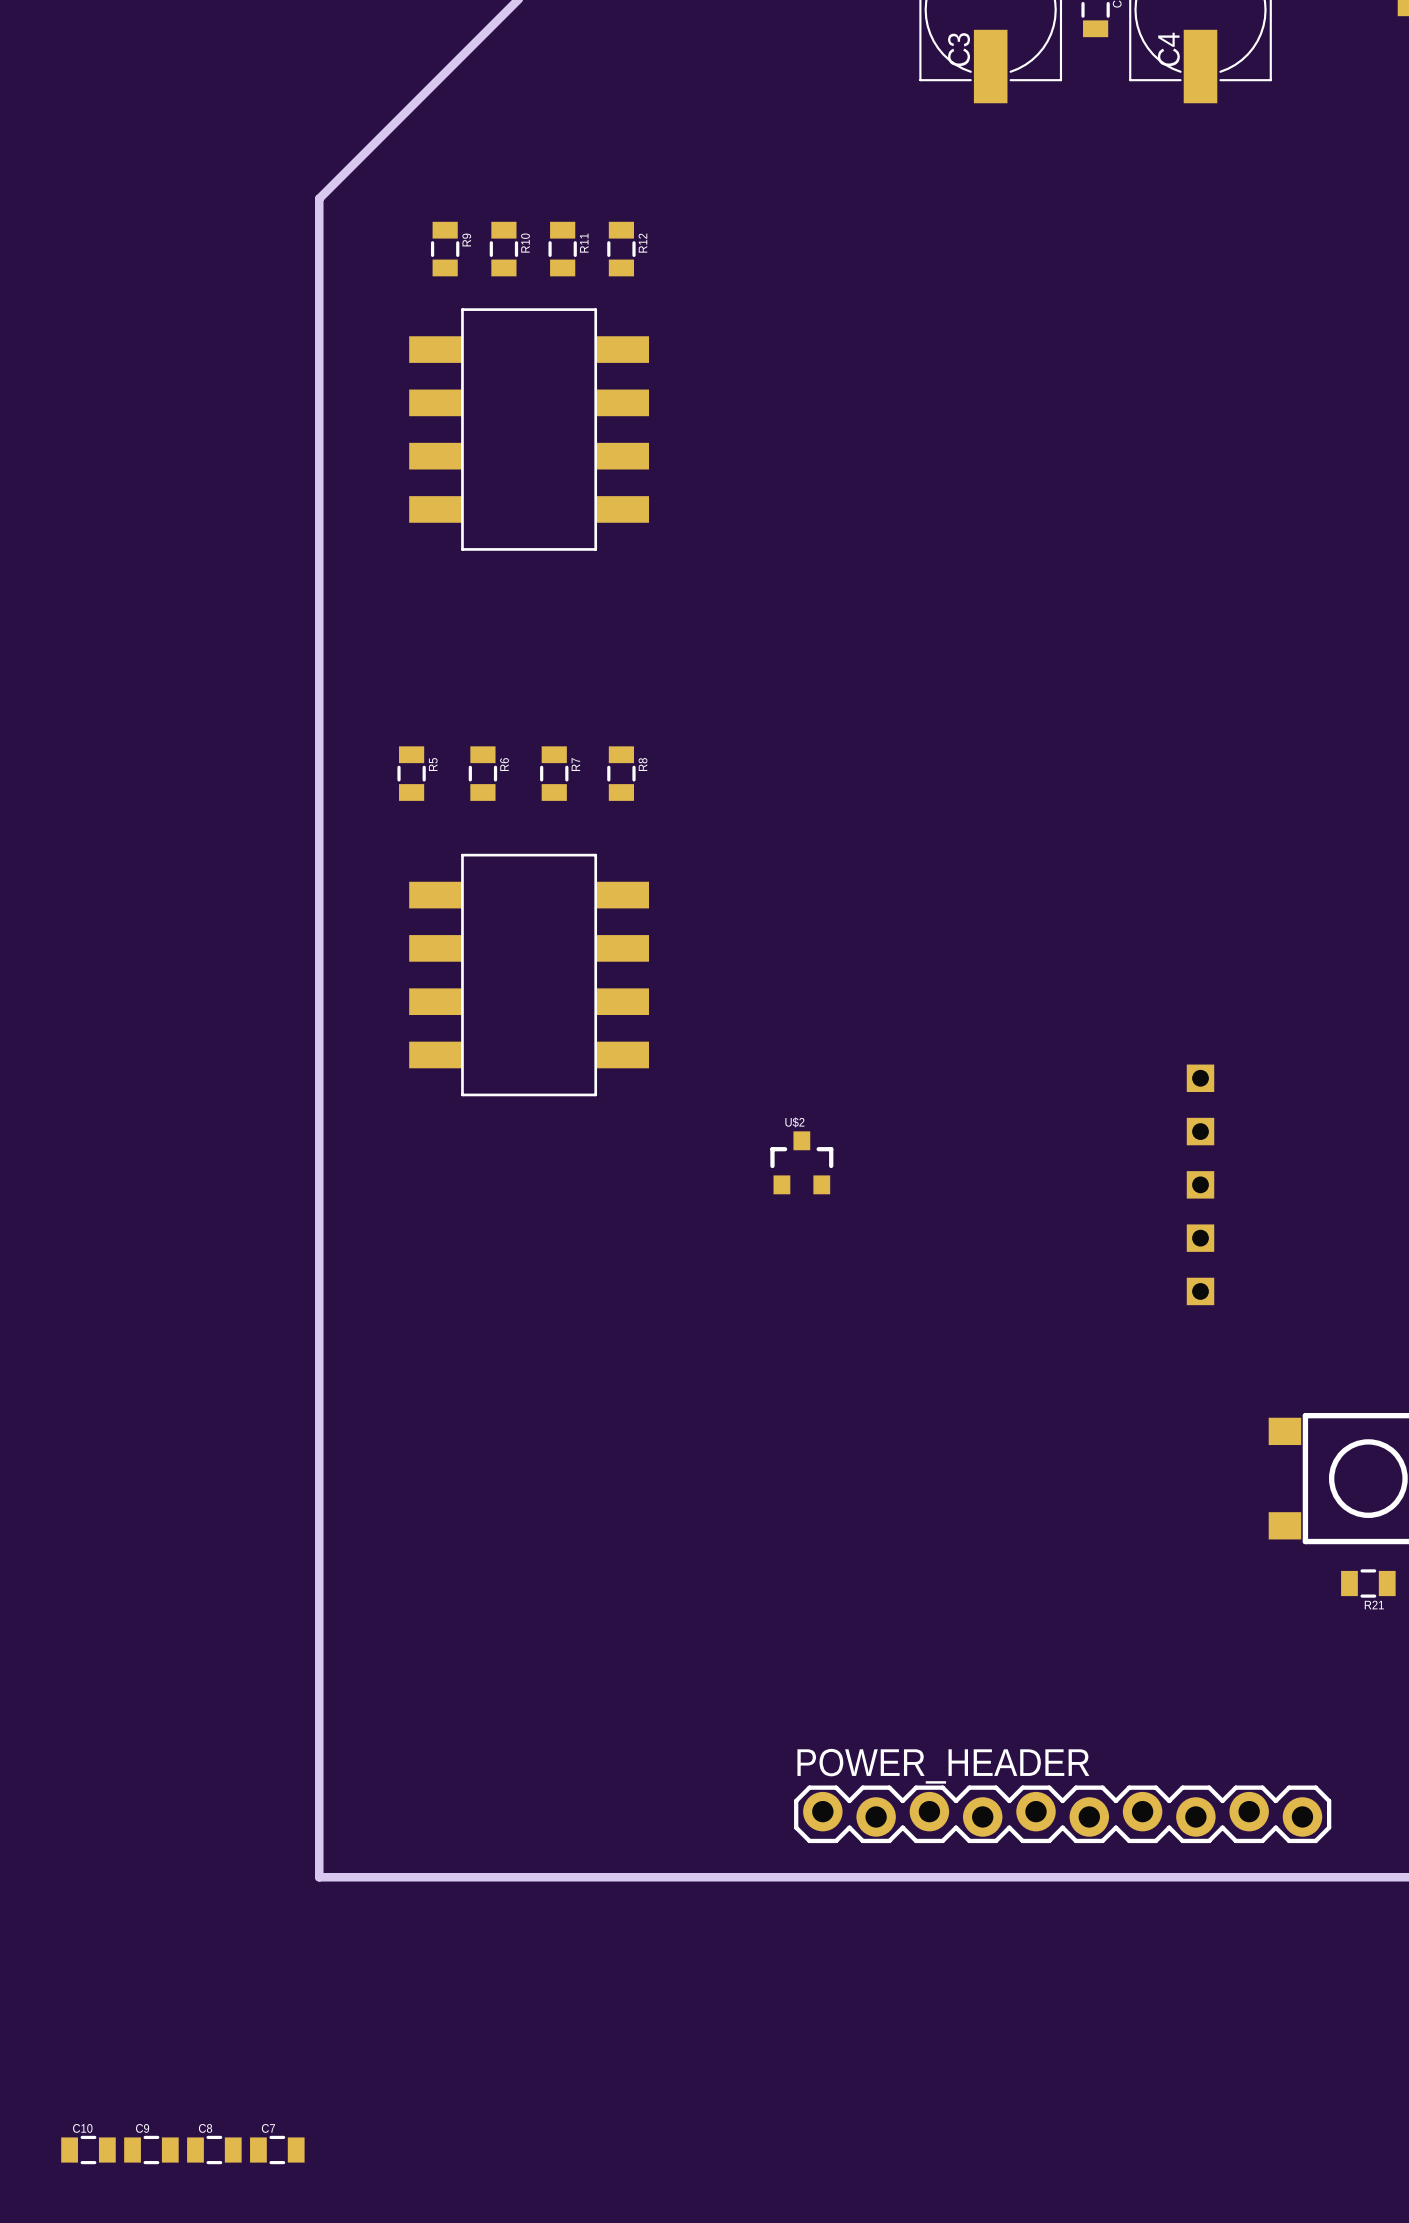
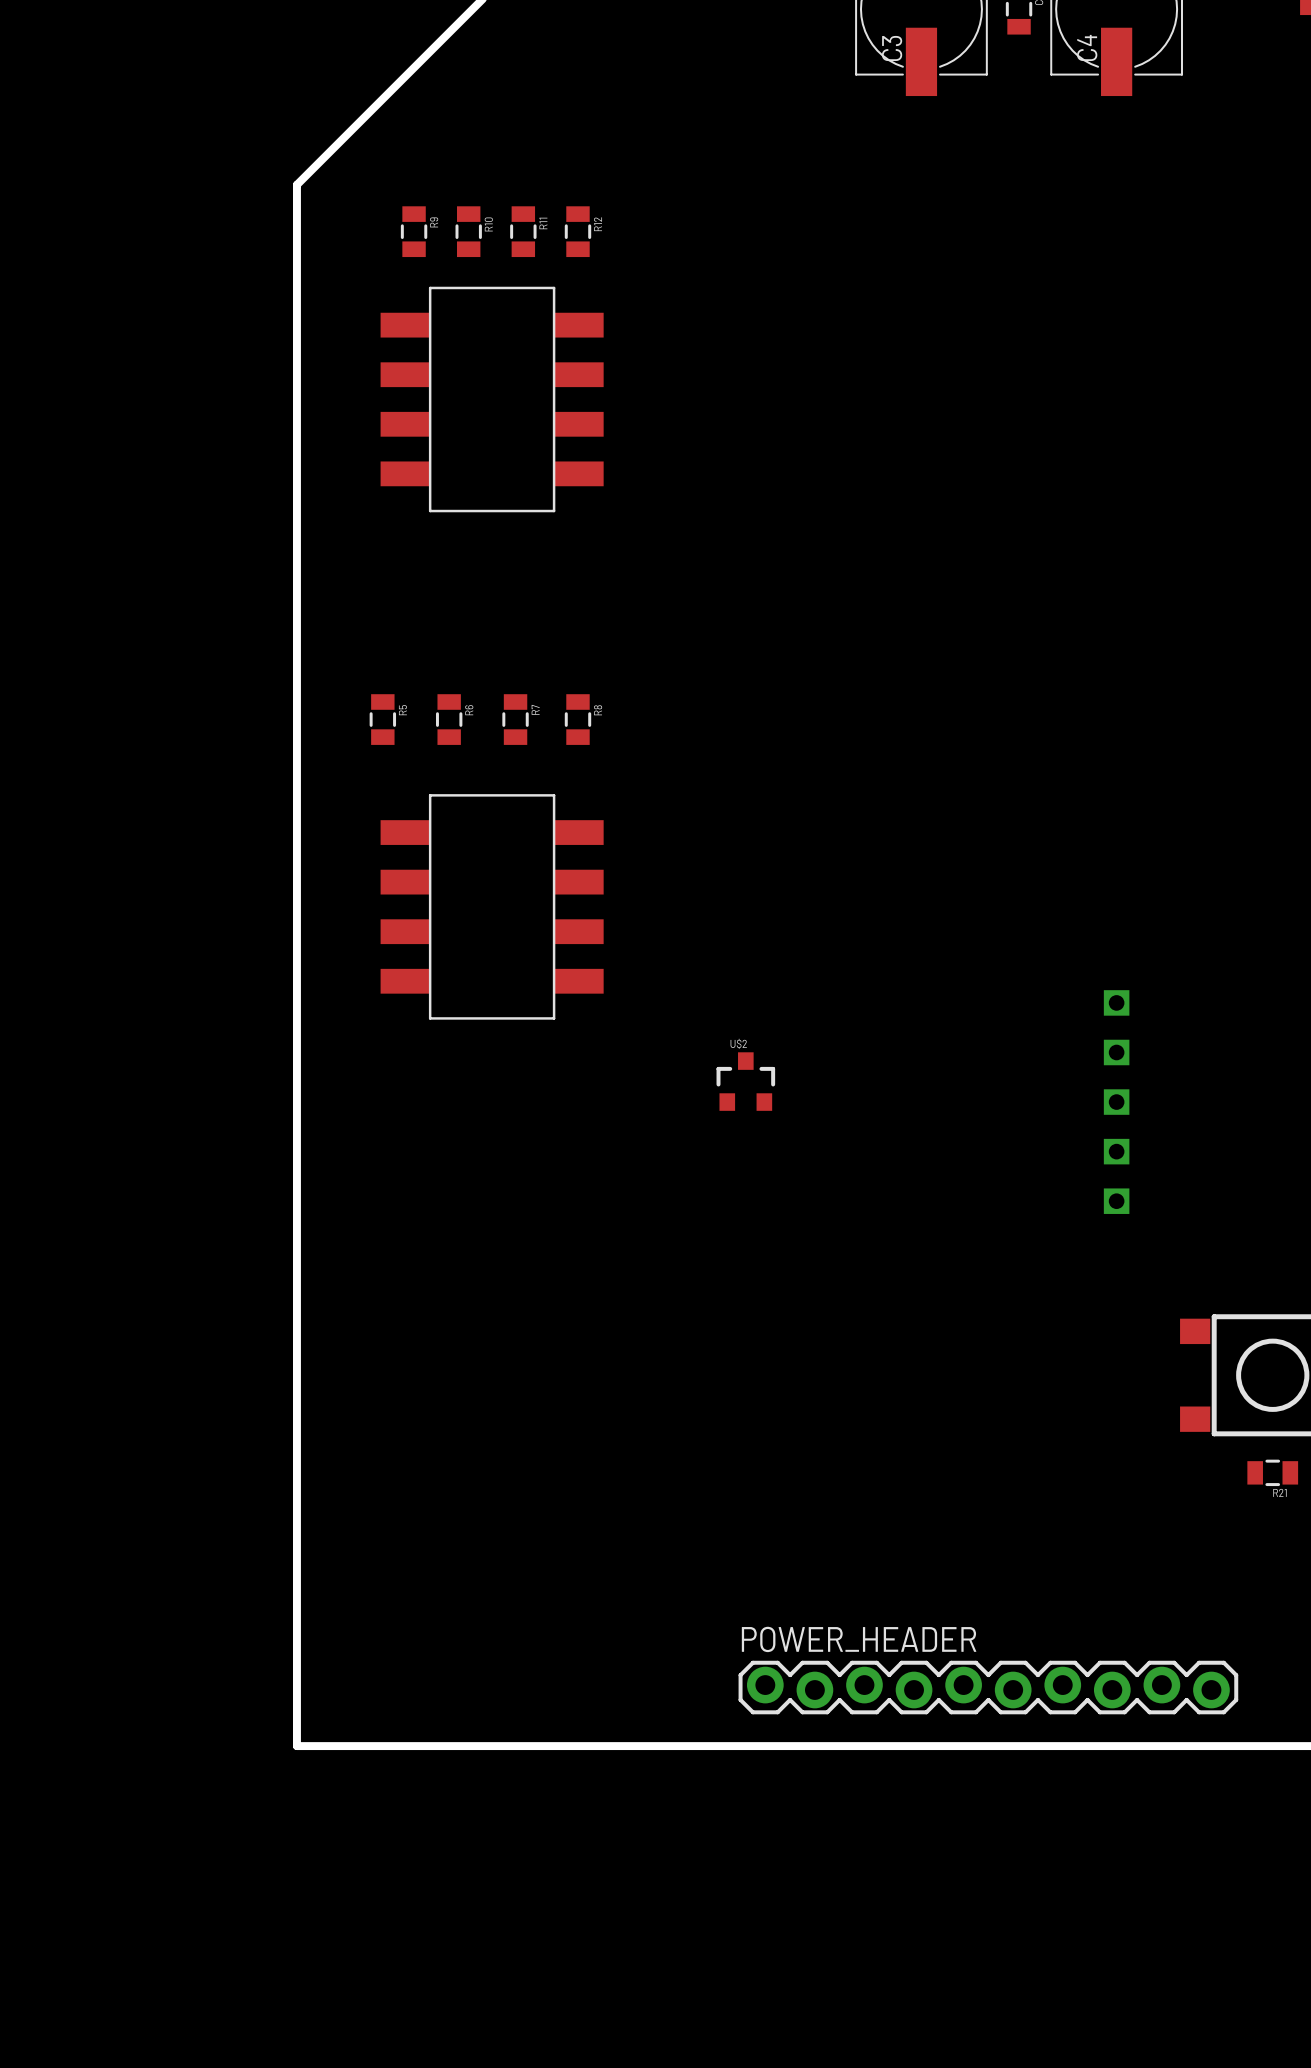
C10: (88, 2150) -> none
C9: (151, 2150) -> none
C8: (214, 2150) -> none
C7: (277, 2150) -> none

